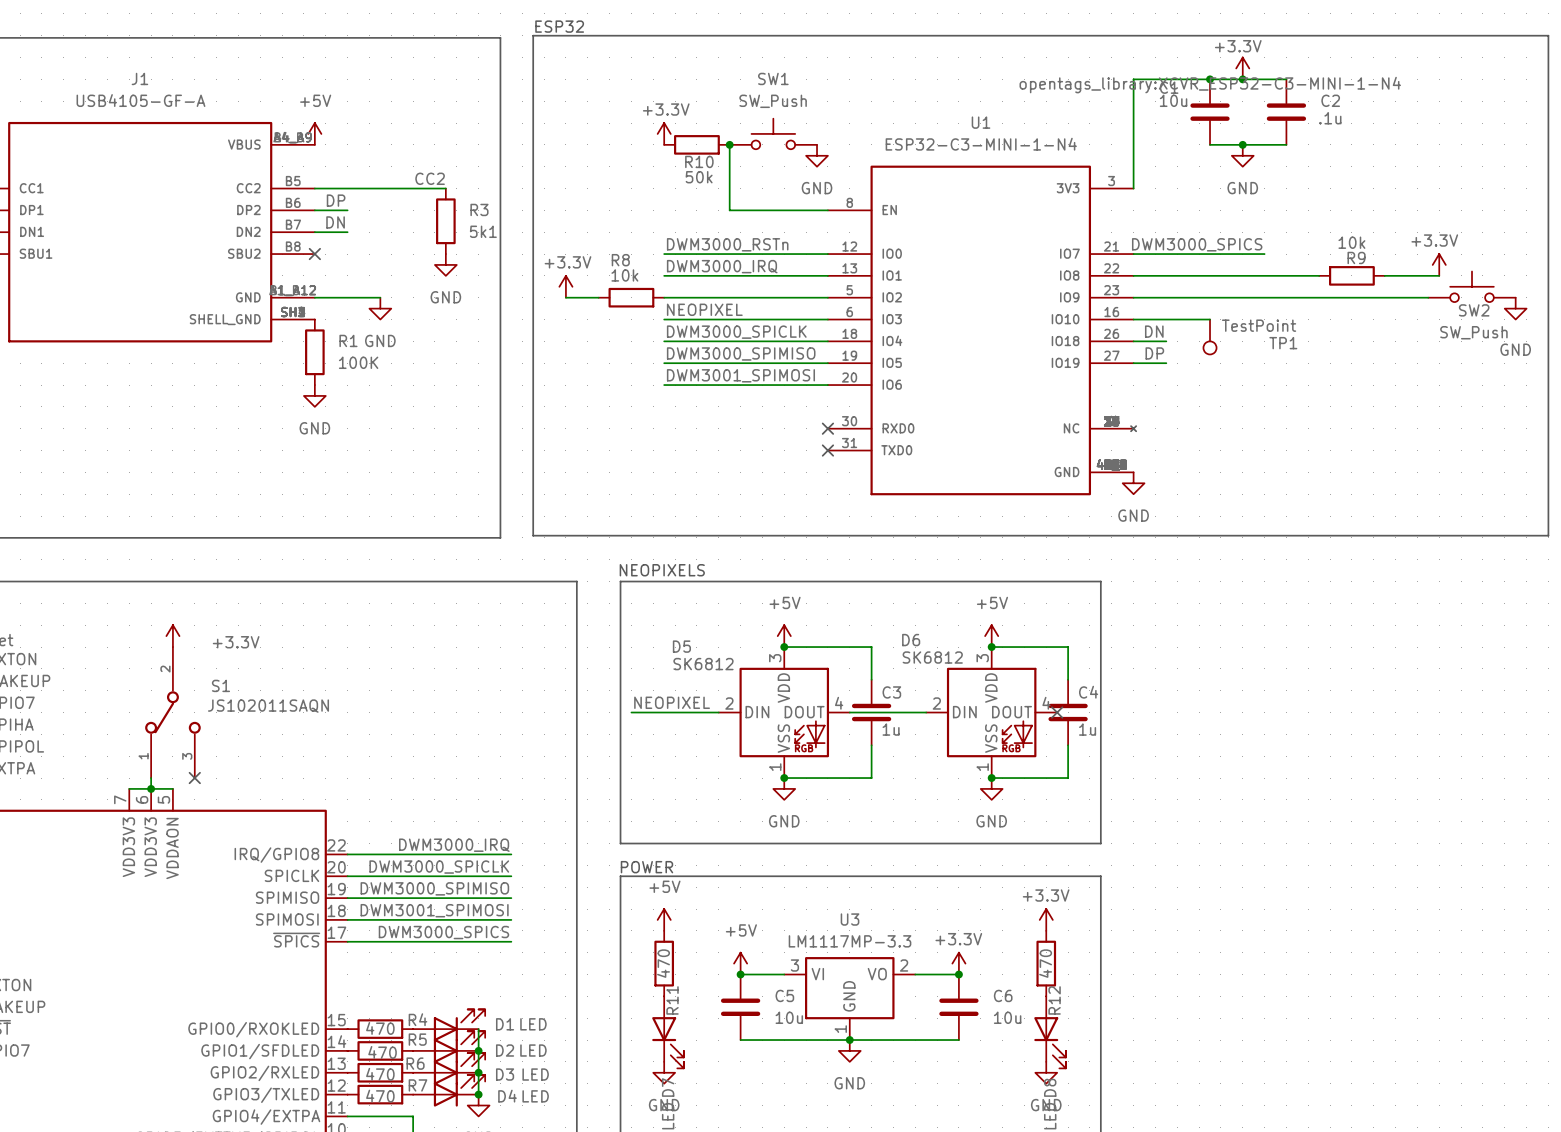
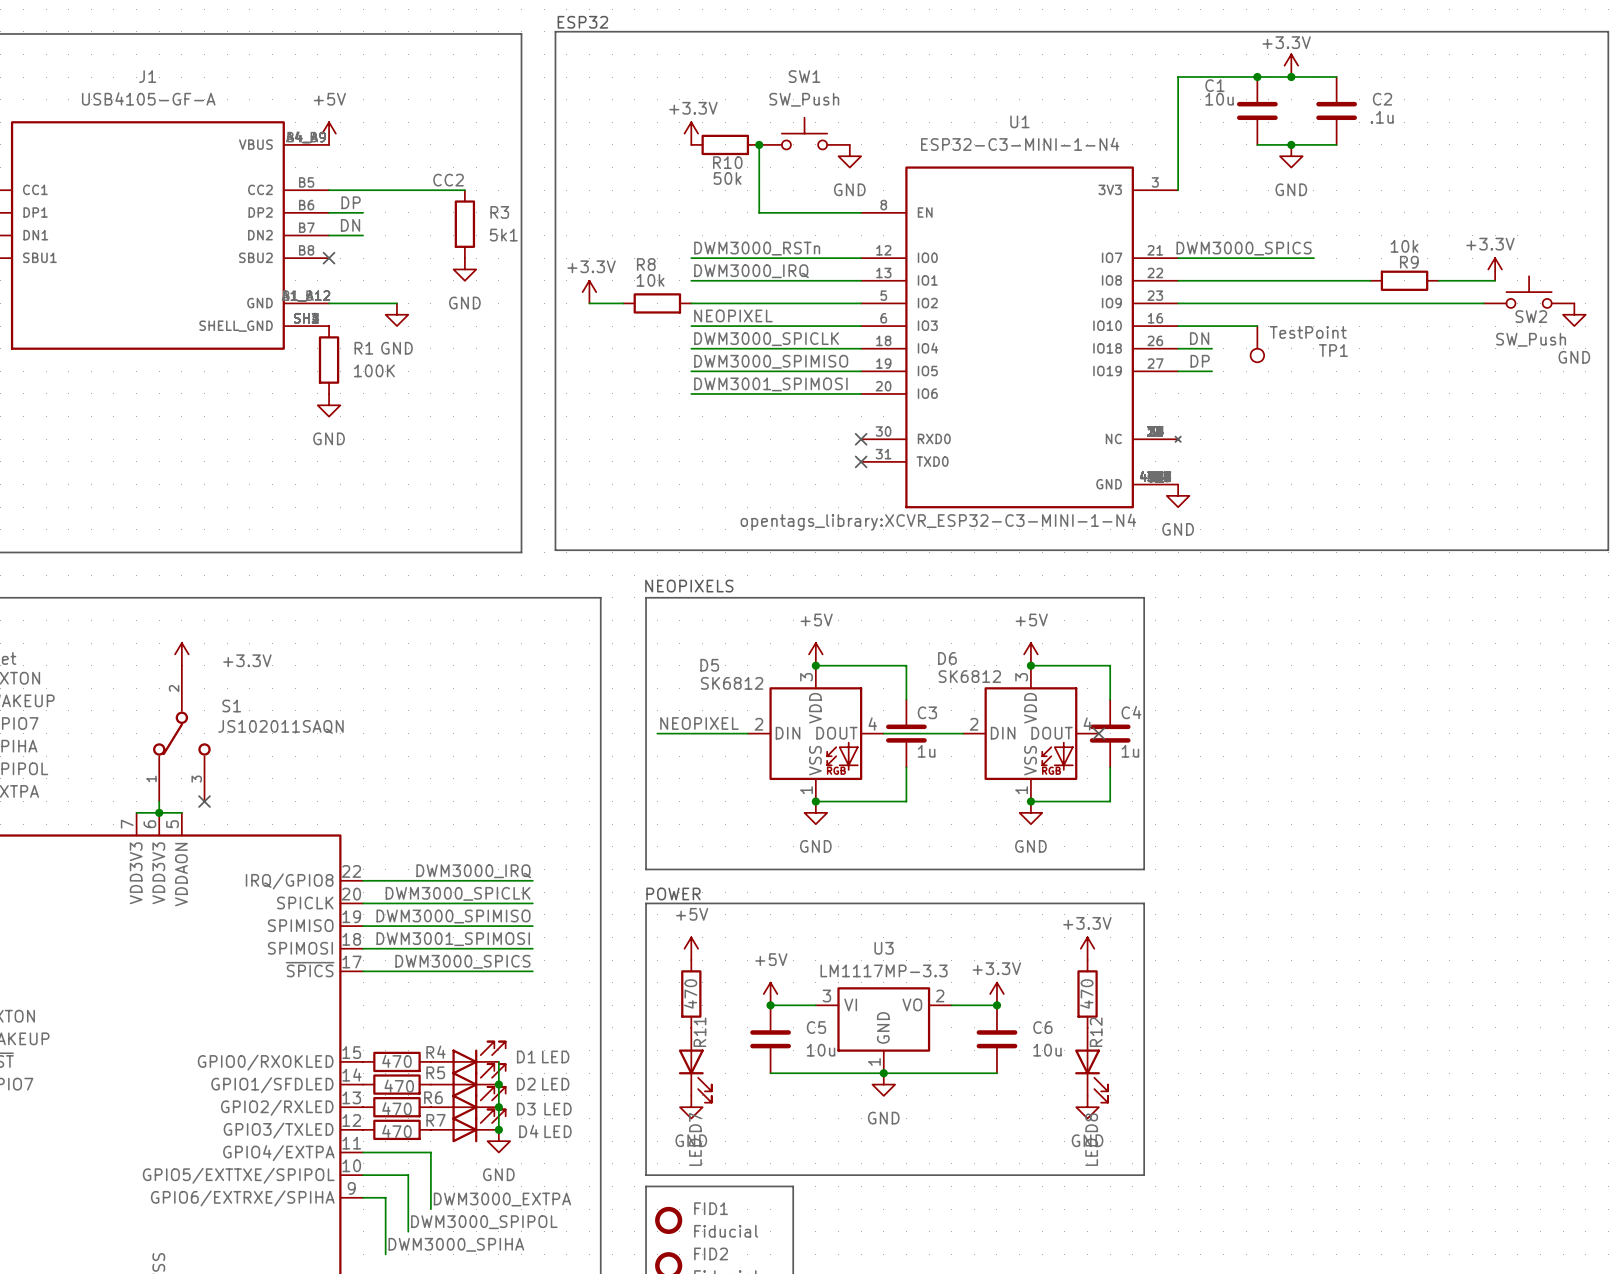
U1 text position: opentags_library:XCVR_ESP32-C3-MINI-1-N4 (1210, 85) -> opentags_library:XCVR_ESP32-C3-MINI-1-N4 (938, 522)

